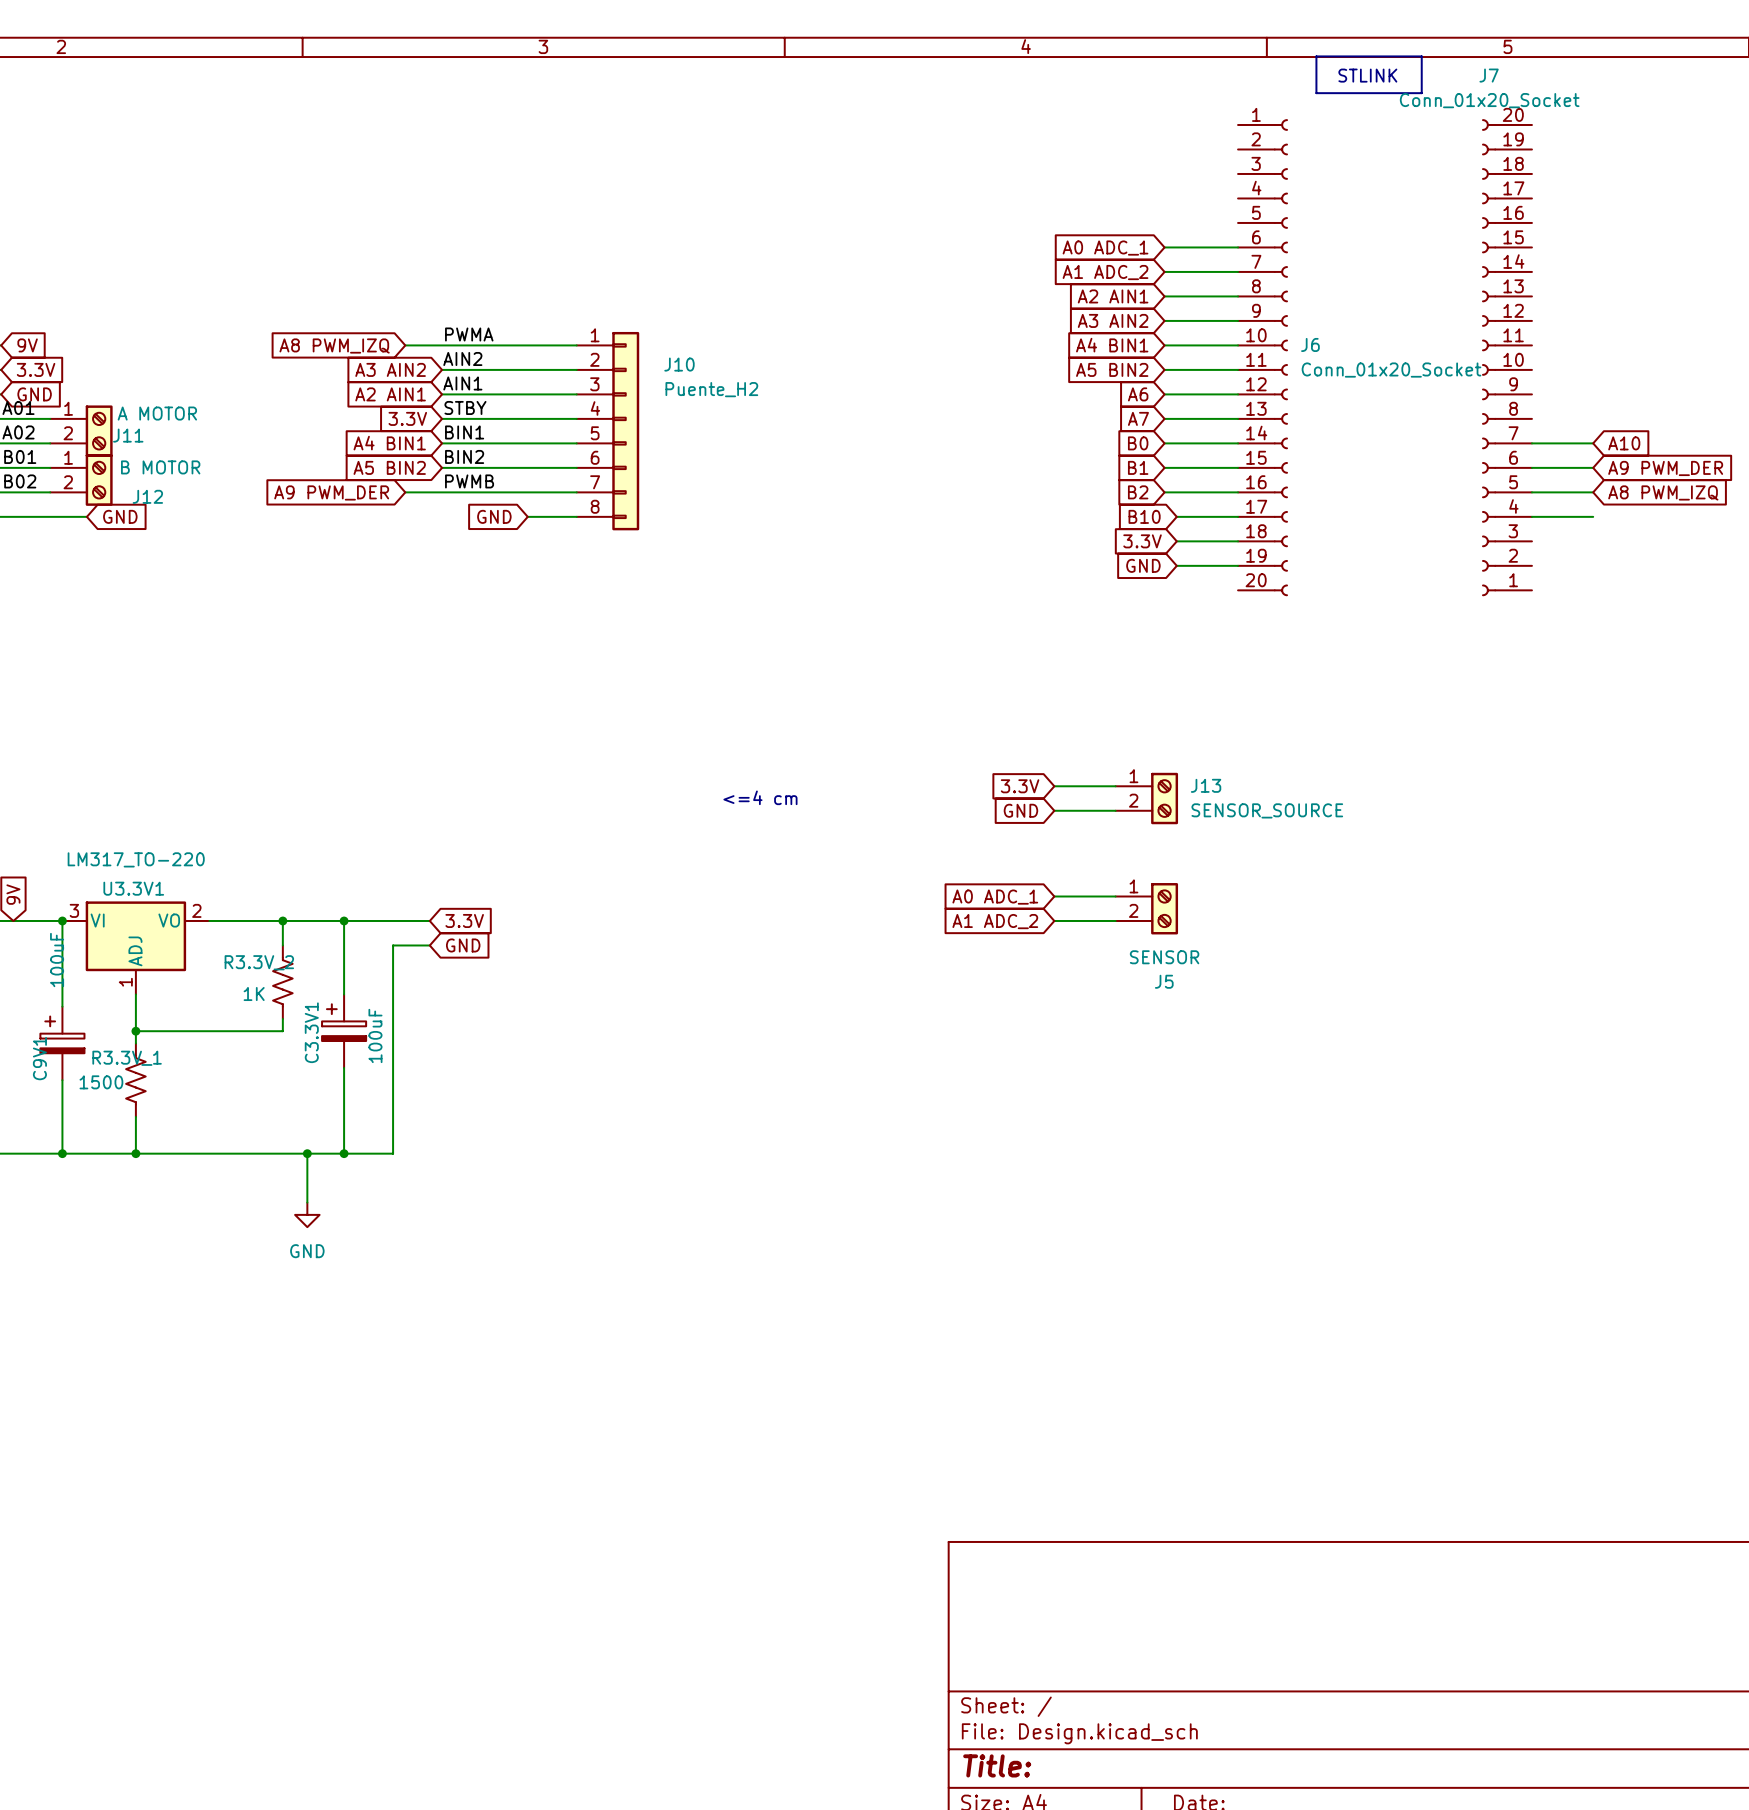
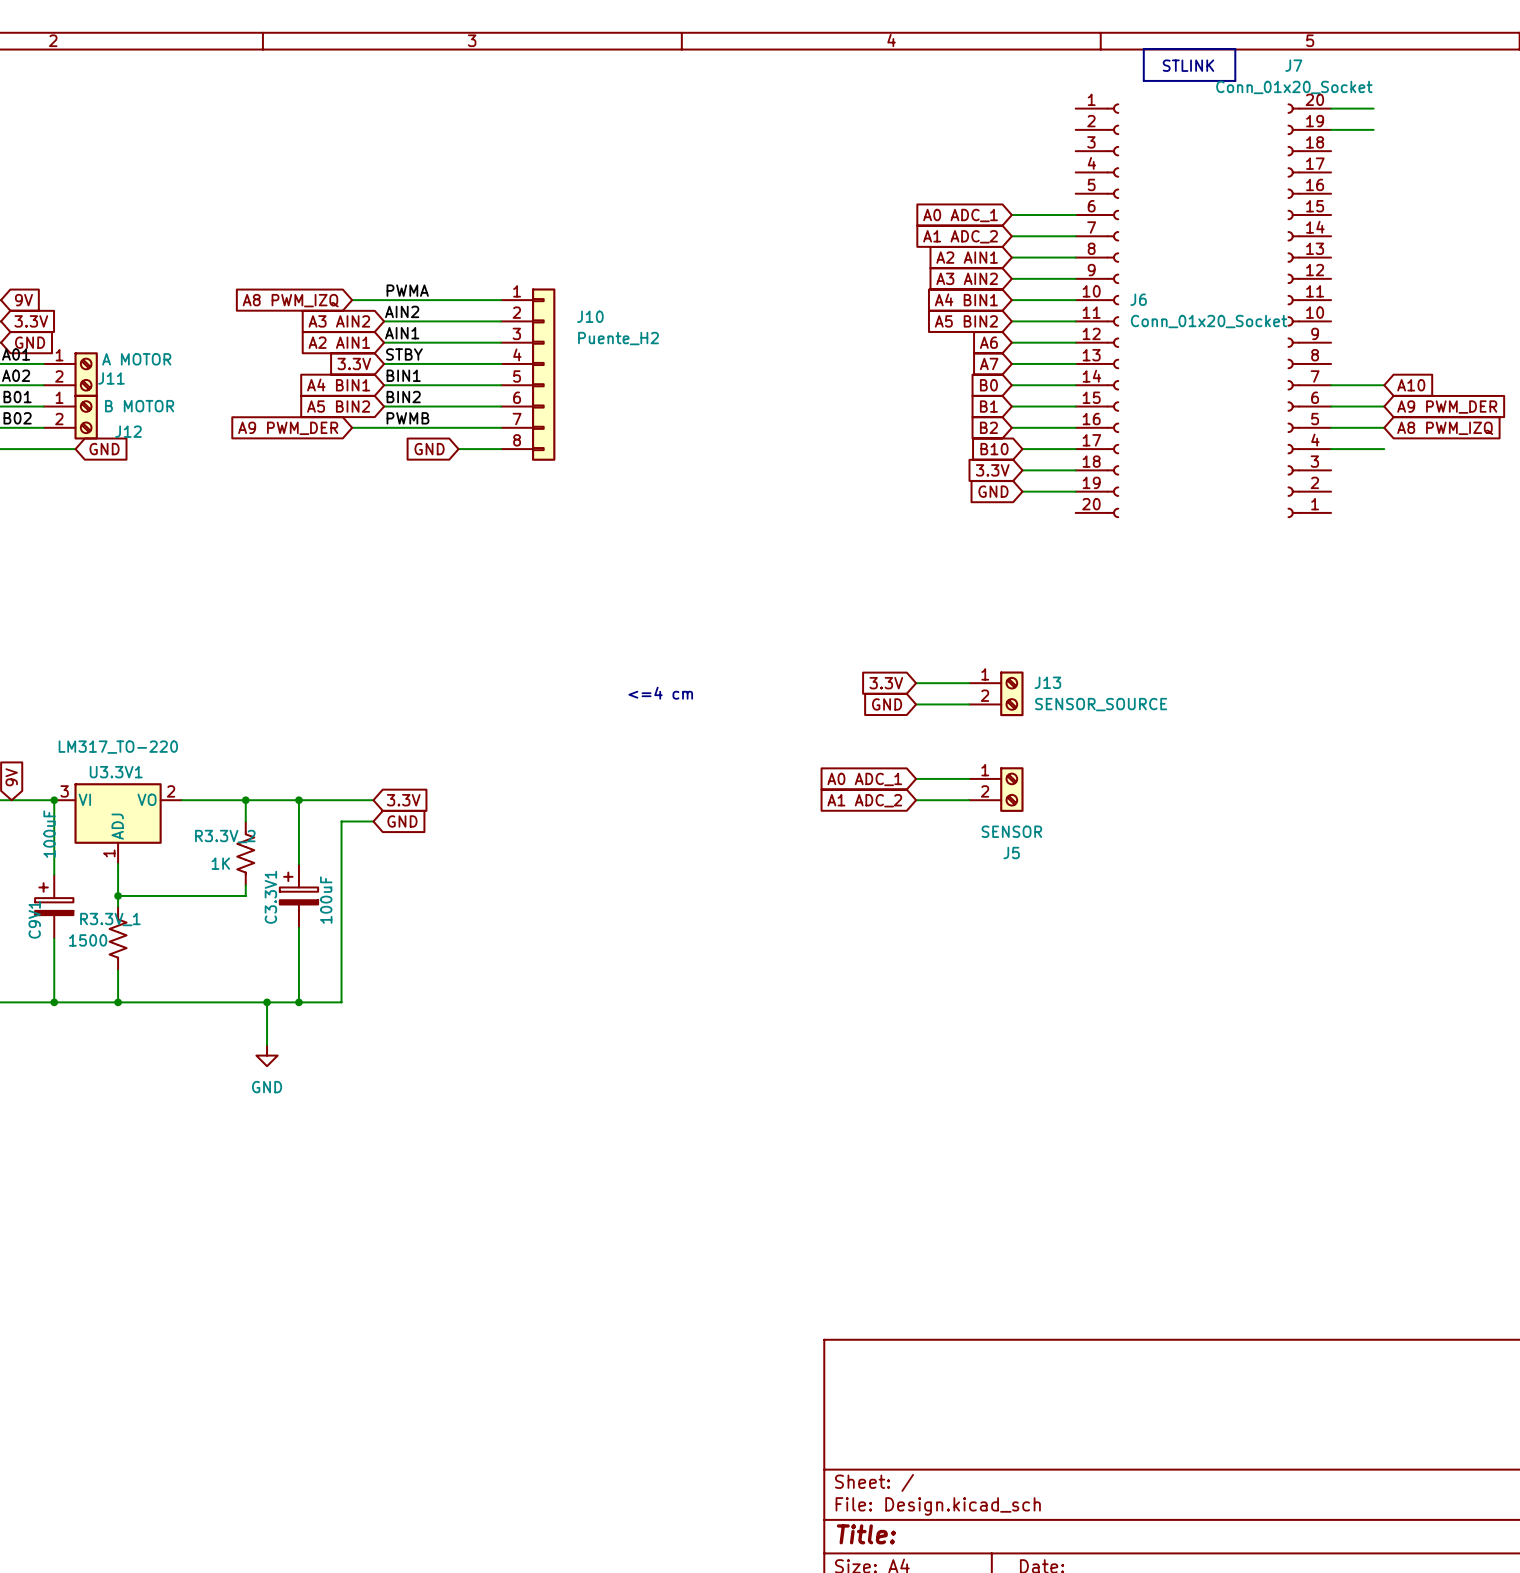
wire: none -> (1331, 108) (1373, 108)
wire: none -> (1331, 129) (1373, 129)

